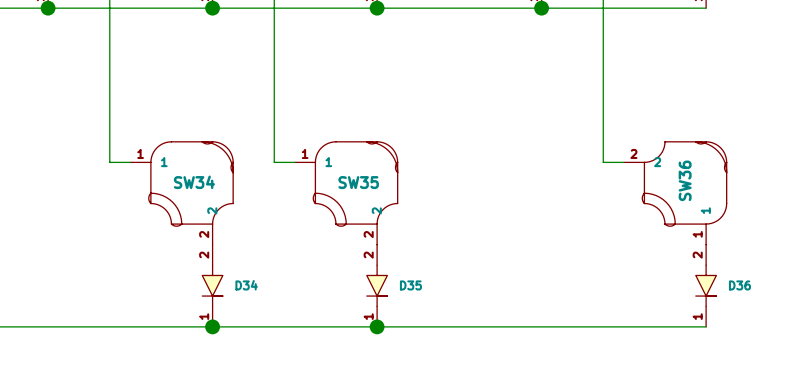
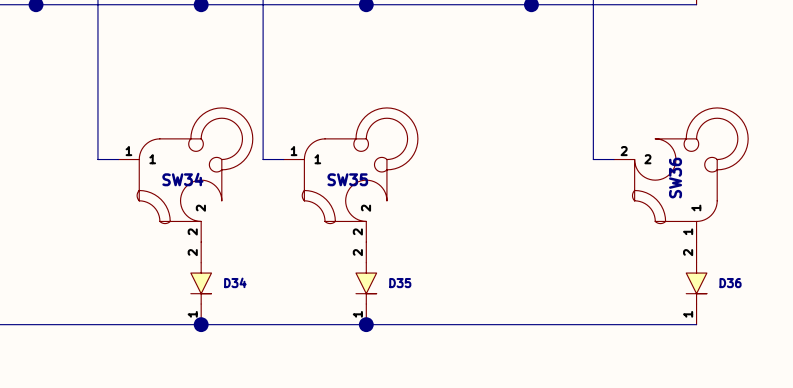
SW34 symbol: [130, 141, 234, 245] -> [118, 107, 253, 243]
SW35 symbol: [294, 141, 398, 245] -> [283, 107, 418, 243]
SW36 symbol: [623, 141, 727, 245] -> [613, 107, 749, 243]

